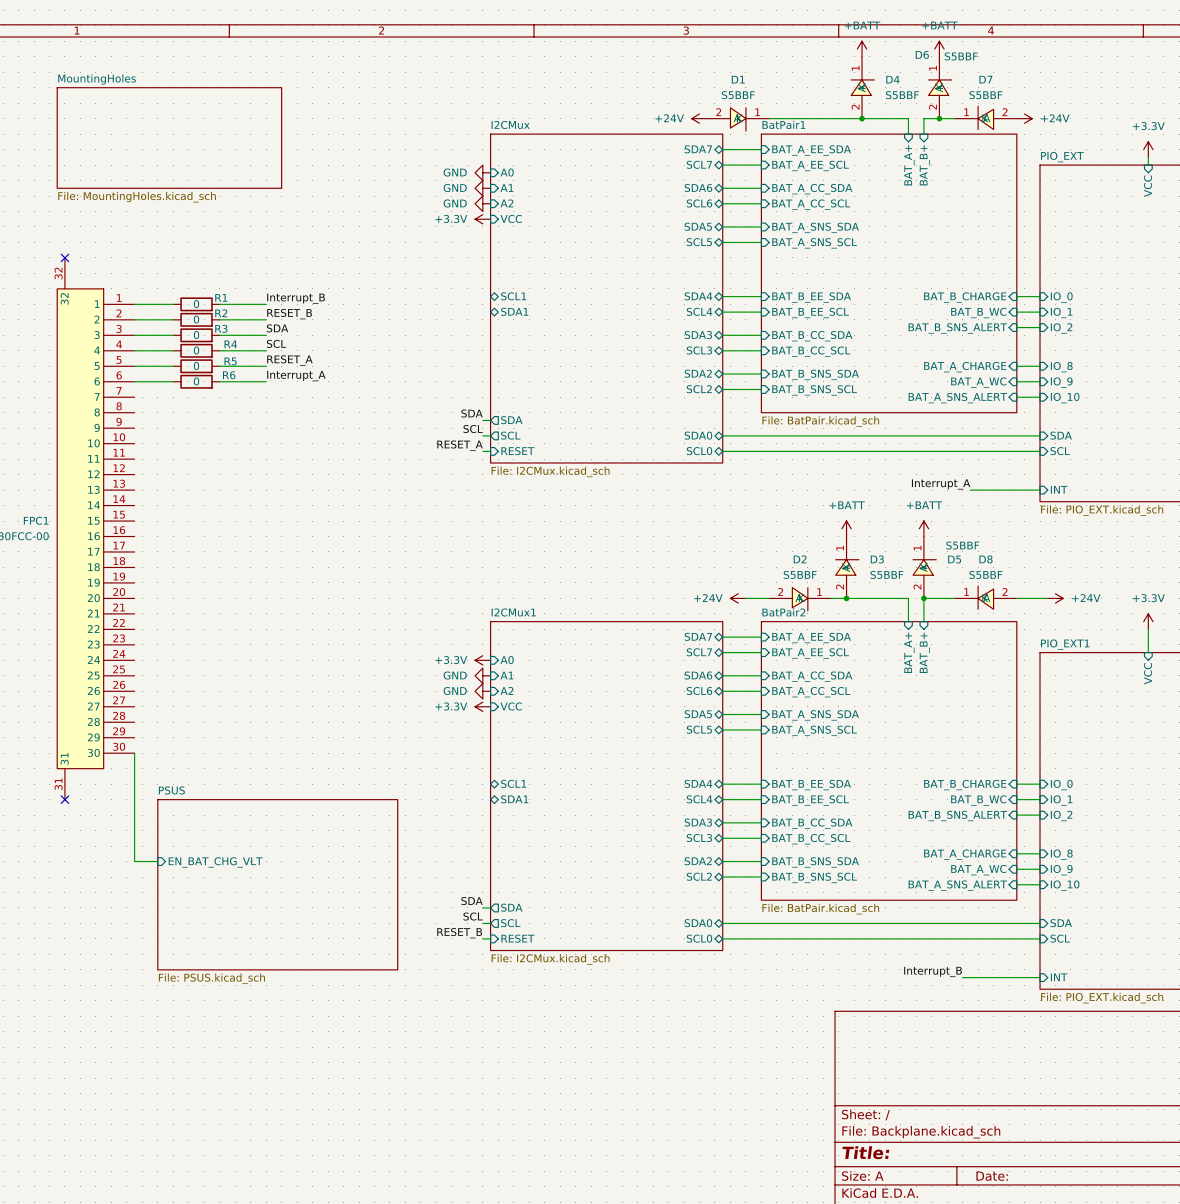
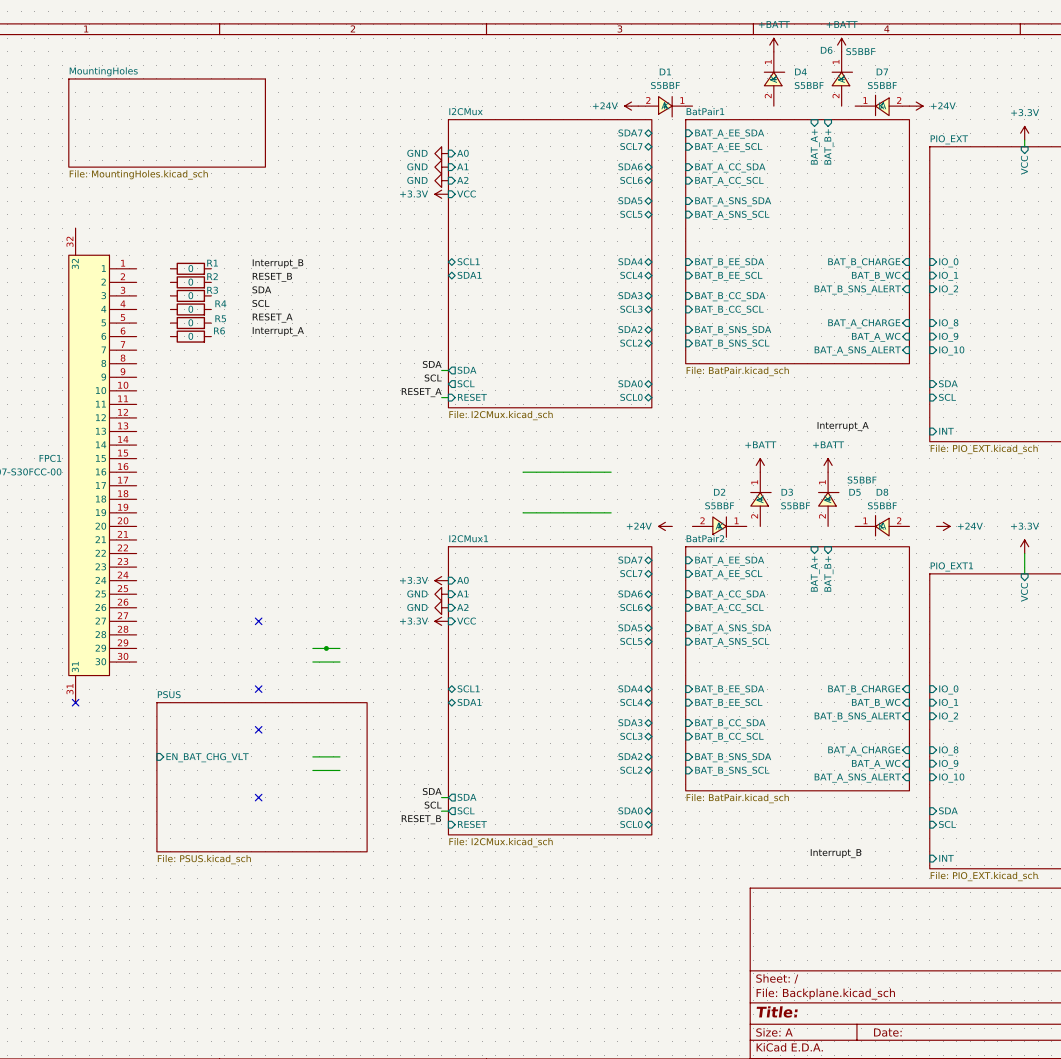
wire: (769, 118) (908, 118) (908, 134) -> none
junction: (862, 118) -> none
junction: (939, 118) -> none
wire: (954, 118) (923, 118) (923, 134) -> none
wire: (722, 149) (761, 149) -> none
wire: (722, 165) (761, 165) -> none
wire: (722, 188) (761, 188) -> none
wire: (722, 203) (761, 203) -> none
wire: (722, 226) (761, 226) -> none
wire: (722, 242) (761, 242) -> none
no-connect mark: (64, 257) -> none
wire: (722, 296) (761, 296) -> none
wire: (1016, 296) (1040, 296) -> none
wire: (134, 304) (173, 304) -> none
wire: (219, 304) (266, 304) -> none
wire: (722, 312) (761, 312) -> none
wire: (1016, 312) (1040, 312) -> none
wire: (134, 319) (173, 319) -> none
wire: (219, 319) (266, 319) -> none
wire: (1016, 327) (1040, 327) -> none
wire: (134, 335) (173, 335) -> none
wire: (219, 335) (266, 335) -> none
wire: (722, 335) (761, 335) -> none
wire: (134, 350) (173, 350) -> none
wire: (219, 350) (266, 350) -> none
wire: (722, 350) (761, 350) -> none
wire: (134, 366) (173, 366) -> none
wire: (219, 366) (266, 366) -> none
wire: (1016, 366) (1040, 366) -> none
wire: (722, 374) (761, 374) -> none
wire: (134, 381) (173, 381) -> none
wire: (219, 381) (266, 381) -> none
wire: (1016, 381) (1040, 381) -> none
wire: (722, 389) (761, 389) -> none
wire: (1016, 397) (1040, 397) -> none
wire: (482, 435) (490, 435) -> none
wire: (722, 435) (1040, 435) -> none
wire: (722, 451) (1040, 451) -> none
wire: (970, 490) (1040, 490) -> none
wire: none -> (523, 472) (611, 472)
wire: none -> (523, 512) (611, 512)
wire: (745, 598) (769, 598) -> none
wire: (831, 598) (908, 598) (908, 621) -> none
junction: (846, 598) -> none
junction: (923, 598) -> none
wire: (954, 598) (923, 598) (923, 621) -> none
wire: (1016, 598) (1047, 598) -> none
wire: (722, 637) (761, 637) -> none
wire: (722, 652) (761, 652) -> none
wire: (722, 675) (761, 675) -> none
wire: (722, 691) (761, 691) -> none
no-connect mark: none -> (258, 621)
wire: (722, 714) (761, 714) -> none
wire: (722, 729) (761, 729) -> none
wire: none -> (312, 648) (339, 648)
junction: none -> (326, 648)
wire: (134, 753) (134, 861) (157, 861) -> none
wire: none -> (312, 662) (339, 662)
no-connect mark: none -> (258, 689)
wire: (722, 784) (761, 784) -> none
wire: (1016, 784) (1040, 784) -> none
wire: (722, 799) (761, 799) -> none
wire: (1016, 799) (1040, 799) -> none
wire: (1016, 815) (1040, 815) -> none
wire: (722, 822) (761, 822) -> none
no-connect mark: none -> (258, 729)
wire: (722, 838) (761, 838) -> none
wire: (1016, 853) (1040, 853) -> none
wire: none -> (312, 756) (339, 756)
wire: (722, 861) (761, 861) -> none
wire: (1016, 869) (1040, 869) -> none
wire: none -> (312, 770) (339, 770)
wire: (722, 877) (761, 877) -> none
wire: (1016, 884) (1040, 884) -> none
no-connect mark: none -> (258, 797)
wire: (722, 923) (1040, 923) -> none
wire: (482, 938) (490, 938) -> none
wire: (722, 938) (1040, 938) -> none
wire: (962, 977) (1040, 977) -> none

